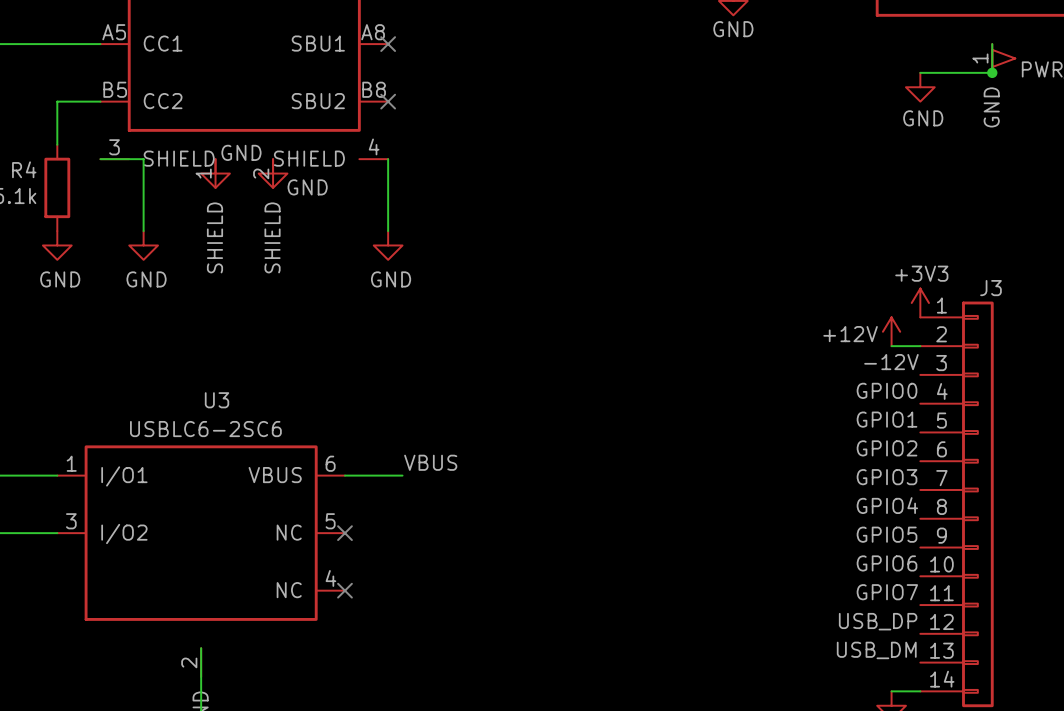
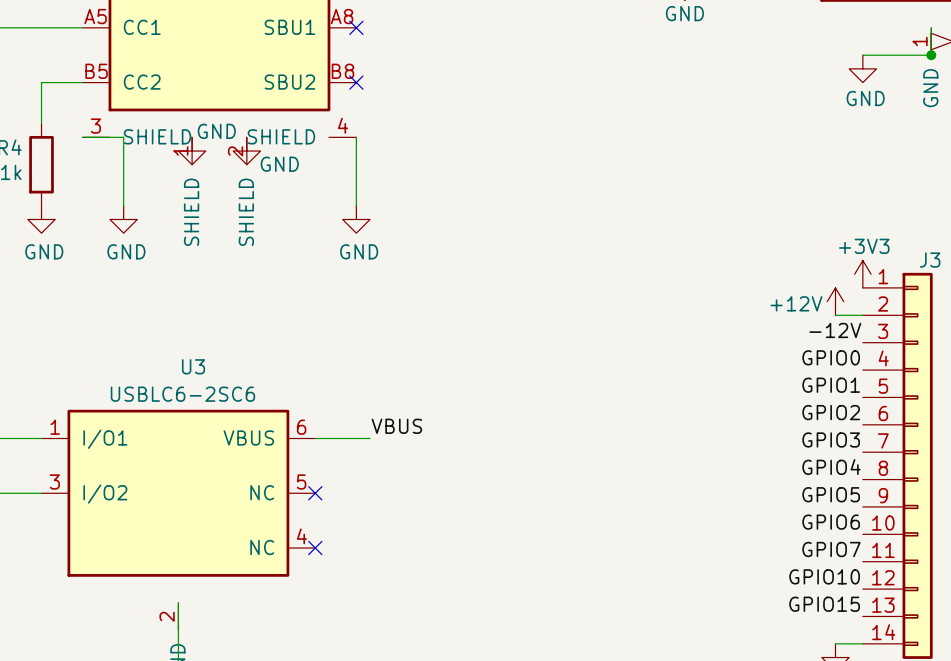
label: USB_DP (878, 621) -> GPIO10 (824, 576)
label: USB_DM (876, 650) -> GPIO15 (824, 604)

